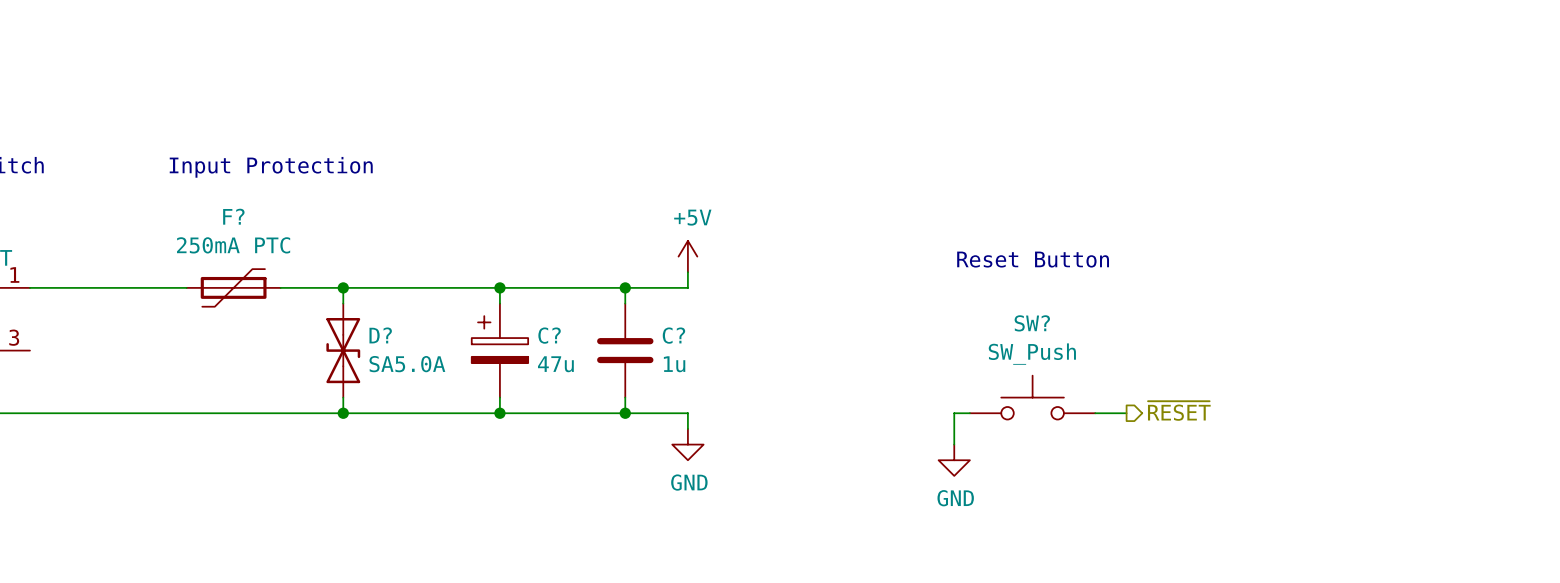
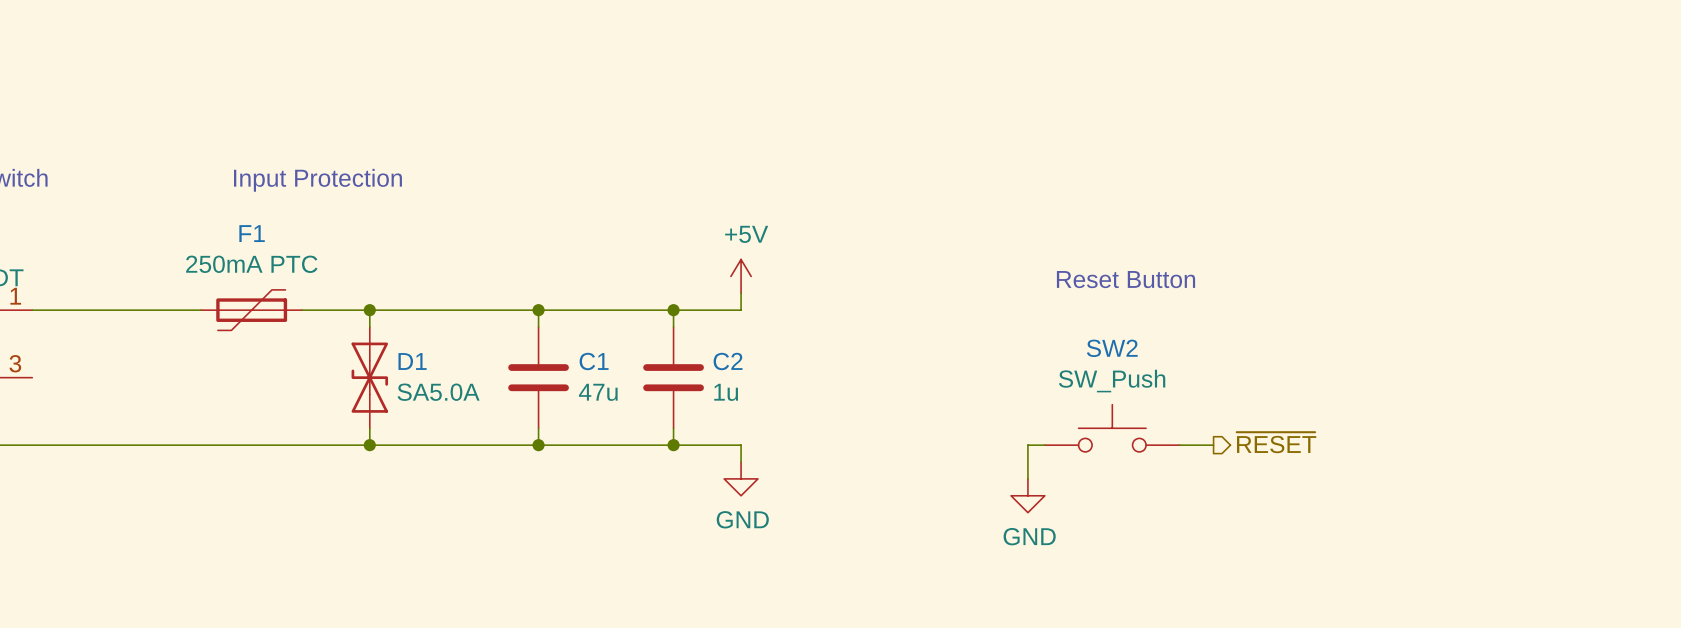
F? name: F? (233, 216) -> F1 (252, 233)
SW? name: SW? (1032, 323) -> SW2 (1112, 348)
D? name: D? (380, 335) -> D1 (412, 361)
C? name: C? (673, 335) -> C2 (728, 361)
C?: 47u (499, 350) -> none
C1: none -> 47u (538, 377)

